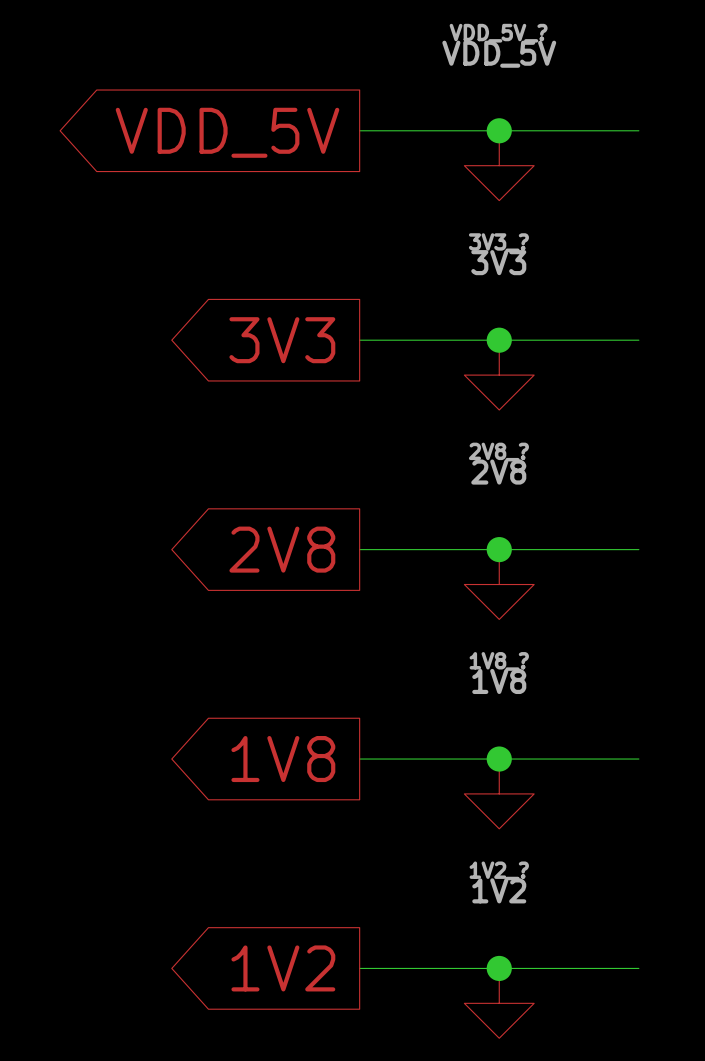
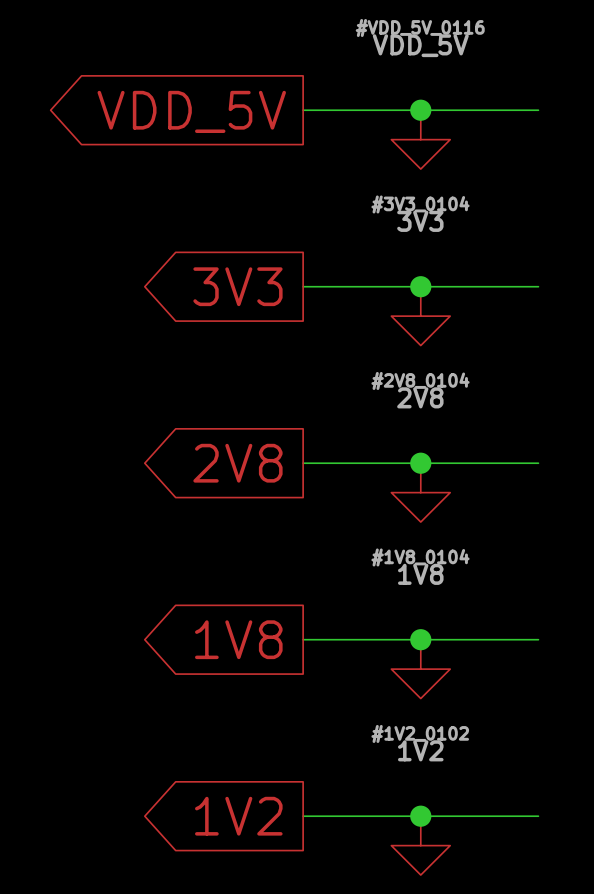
VDD_5V_? name: VDD_5V_? (498, 33) -> #VDD_5V_0116 (420, 27)
3V3_? name: 3V3_? (498, 242) -> #3V3_0104 (420, 204)
2V8_? name: 2V8_? (498, 452) -> #2V8_0104 (420, 380)
1V8_? name: 1V8_? (499, 661) -> #1V8_0104 (420, 557)
1V2_? name: 1V2_? (499, 870) -> #1V2_0102 (420, 733)

